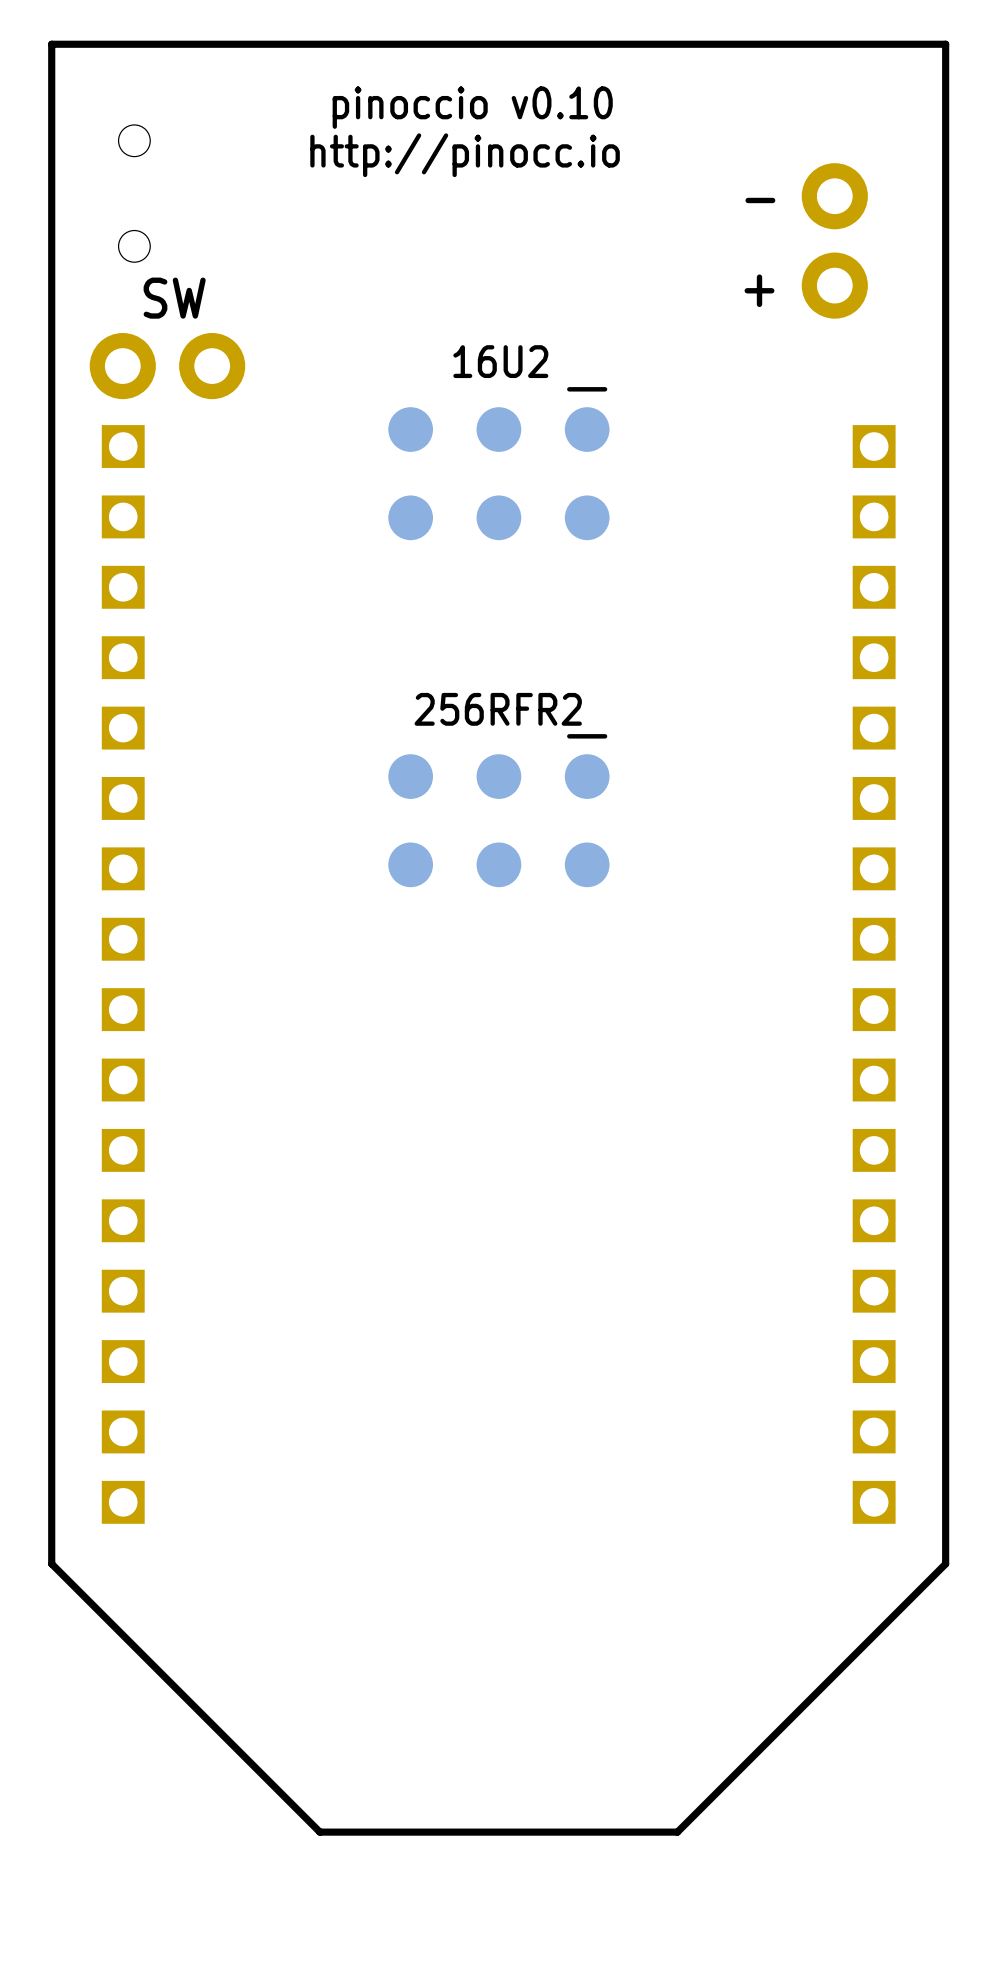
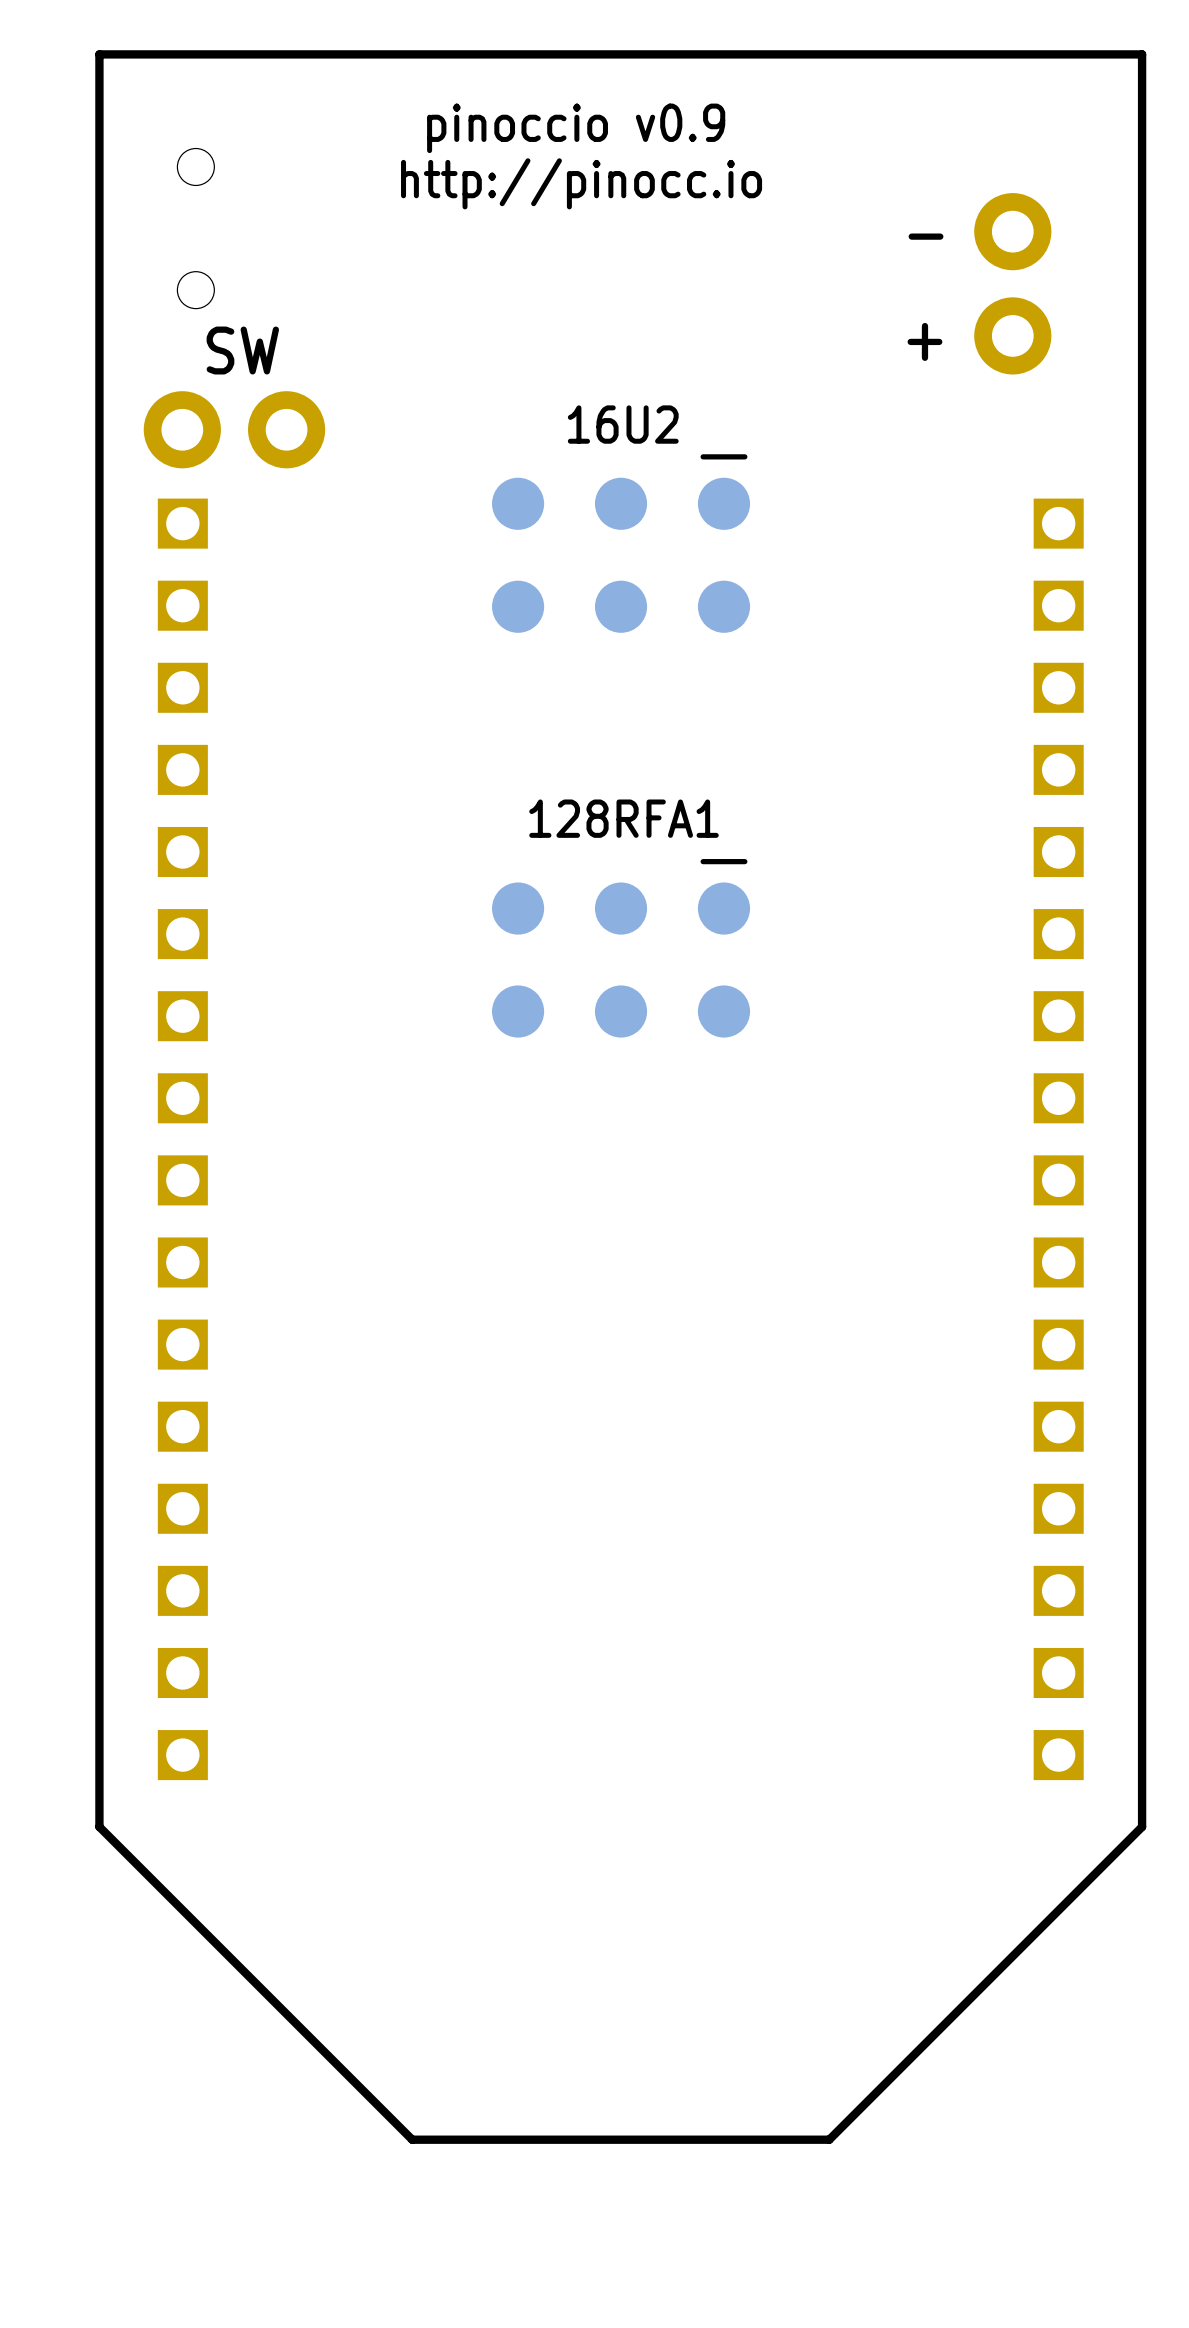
text: pinoccio v0.10 (472, 107) -> pinoccio v0.9 (576, 128)
text: 256RFR2 (498, 709) -> 128RFA1 (623, 818)

